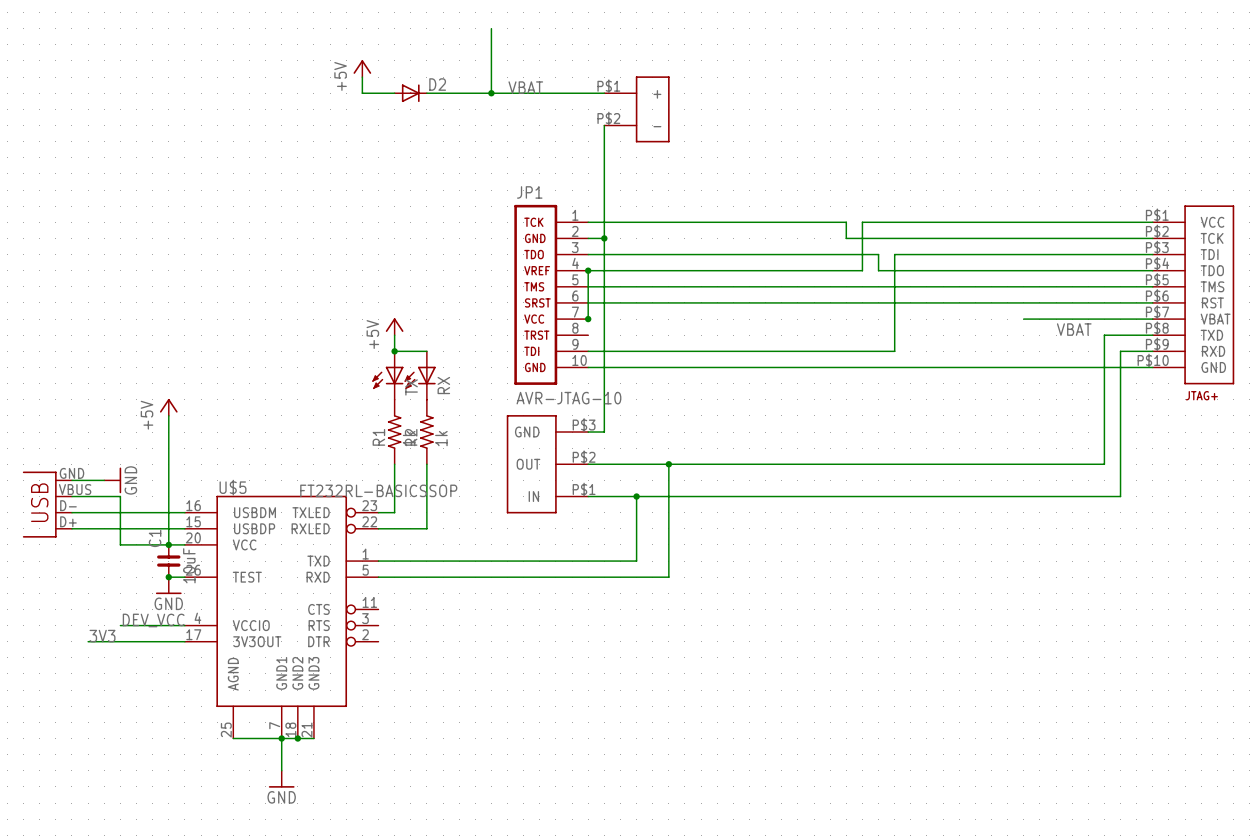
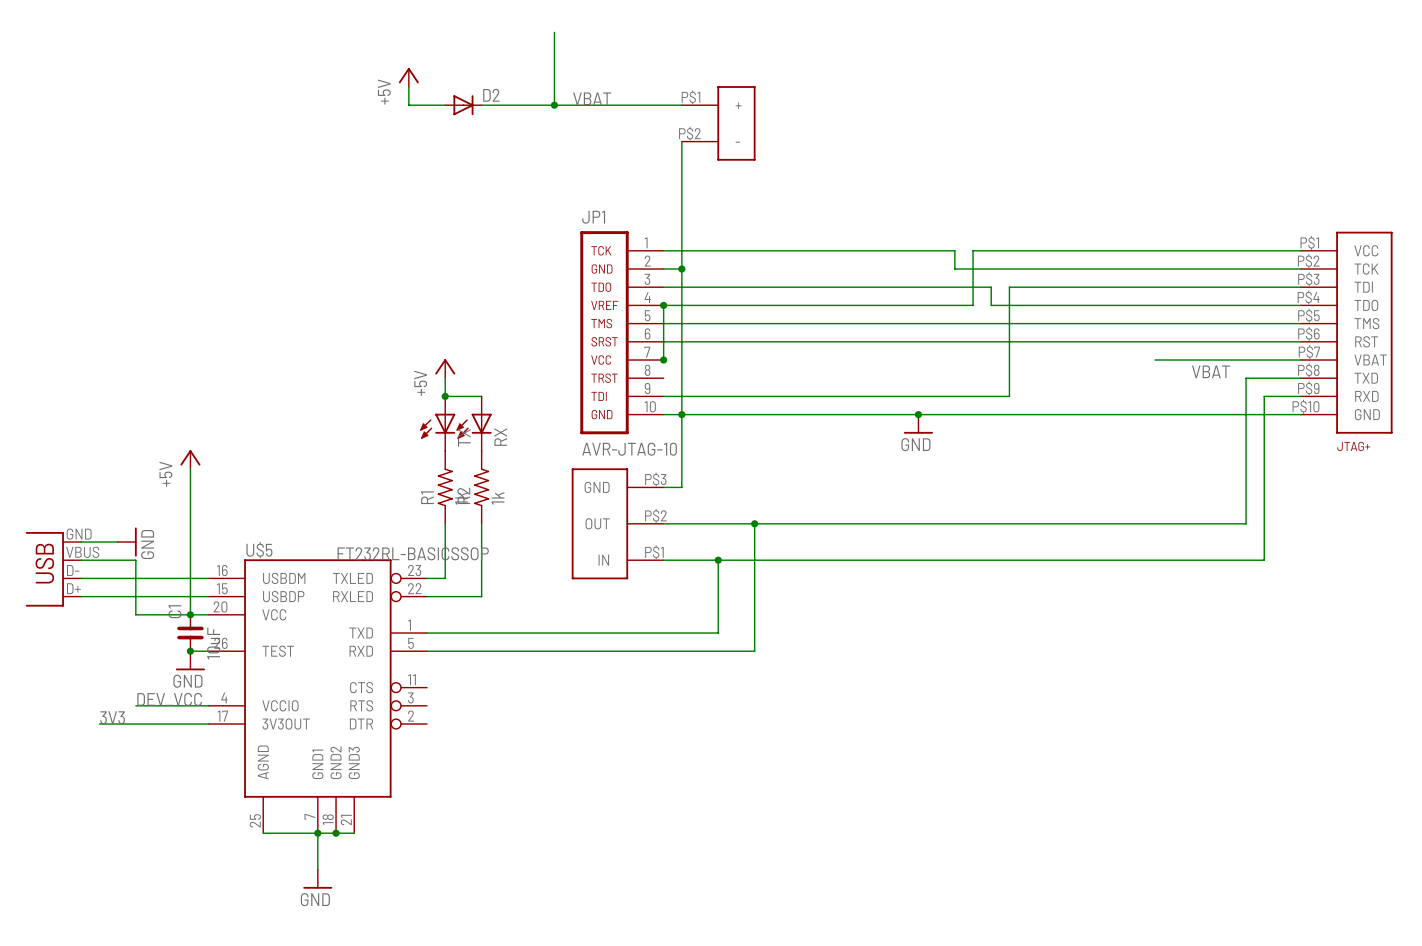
junction: none -> (681, 414)
junction: none -> (918, 414)
power symbol: none -> GND (918, 424)

